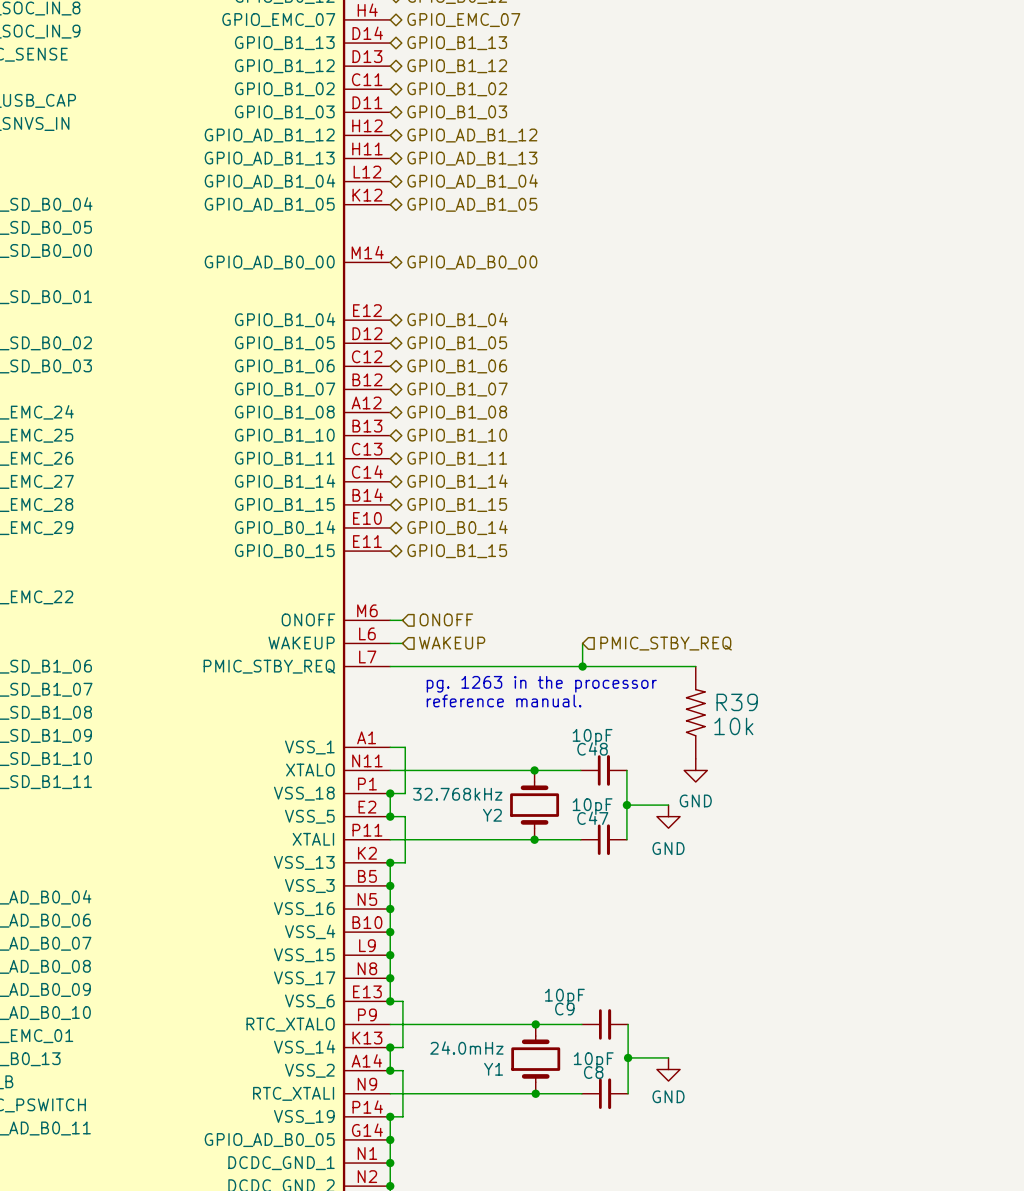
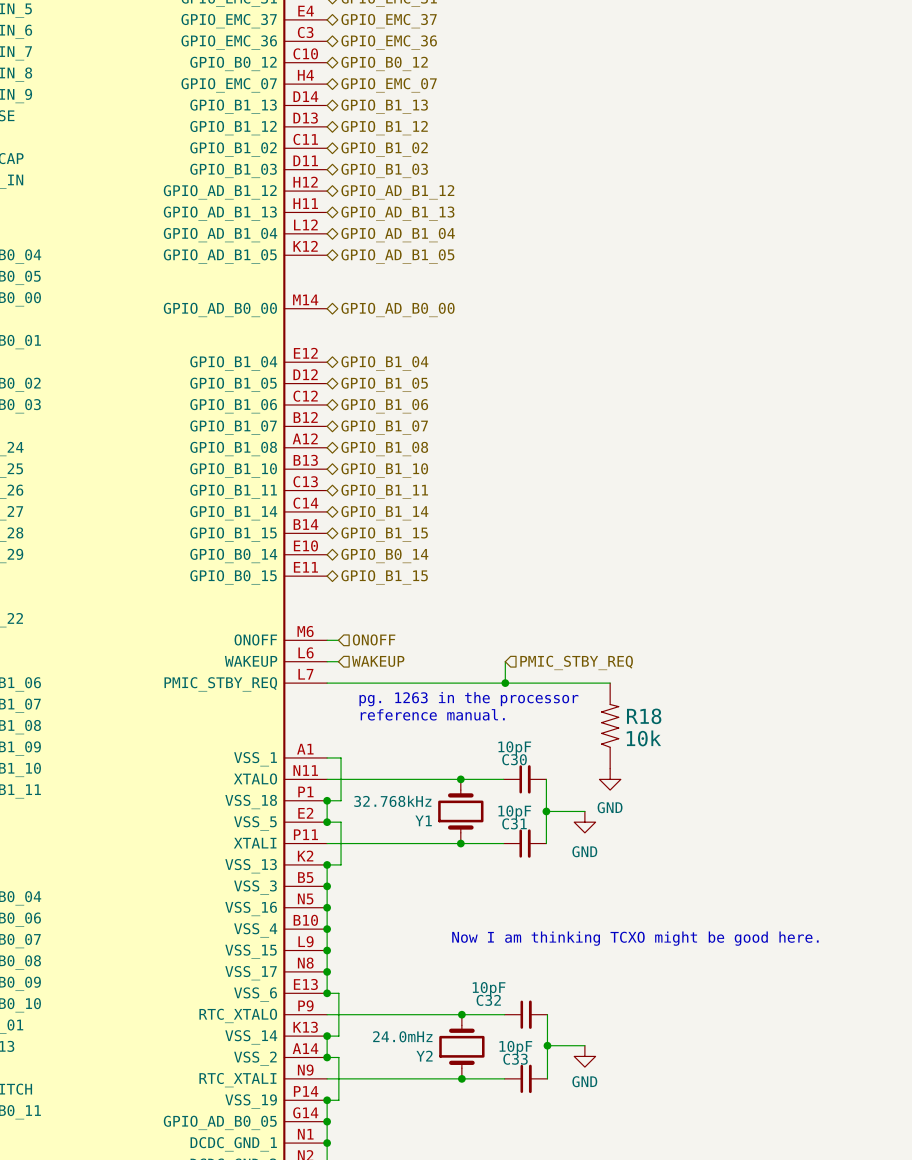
R39 name: R39 (737, 702) -> R18 (644, 716)
C48 name: C48 (592, 748) -> C30 (514, 759)
Y2 name: Y2 (492, 815) -> Y1 (423, 820)
C47 name: C47 (592, 818) -> C31 (514, 823)
text: none -> Now I am thinking TCXO might be good here. (635, 938)
C9 name: C9 (564, 1009) -> C32 (488, 1000)
Y1 name: Y1 (493, 1069) -> Y2 (424, 1056)
C8 name: C8 (593, 1072) -> C33 (515, 1059)

